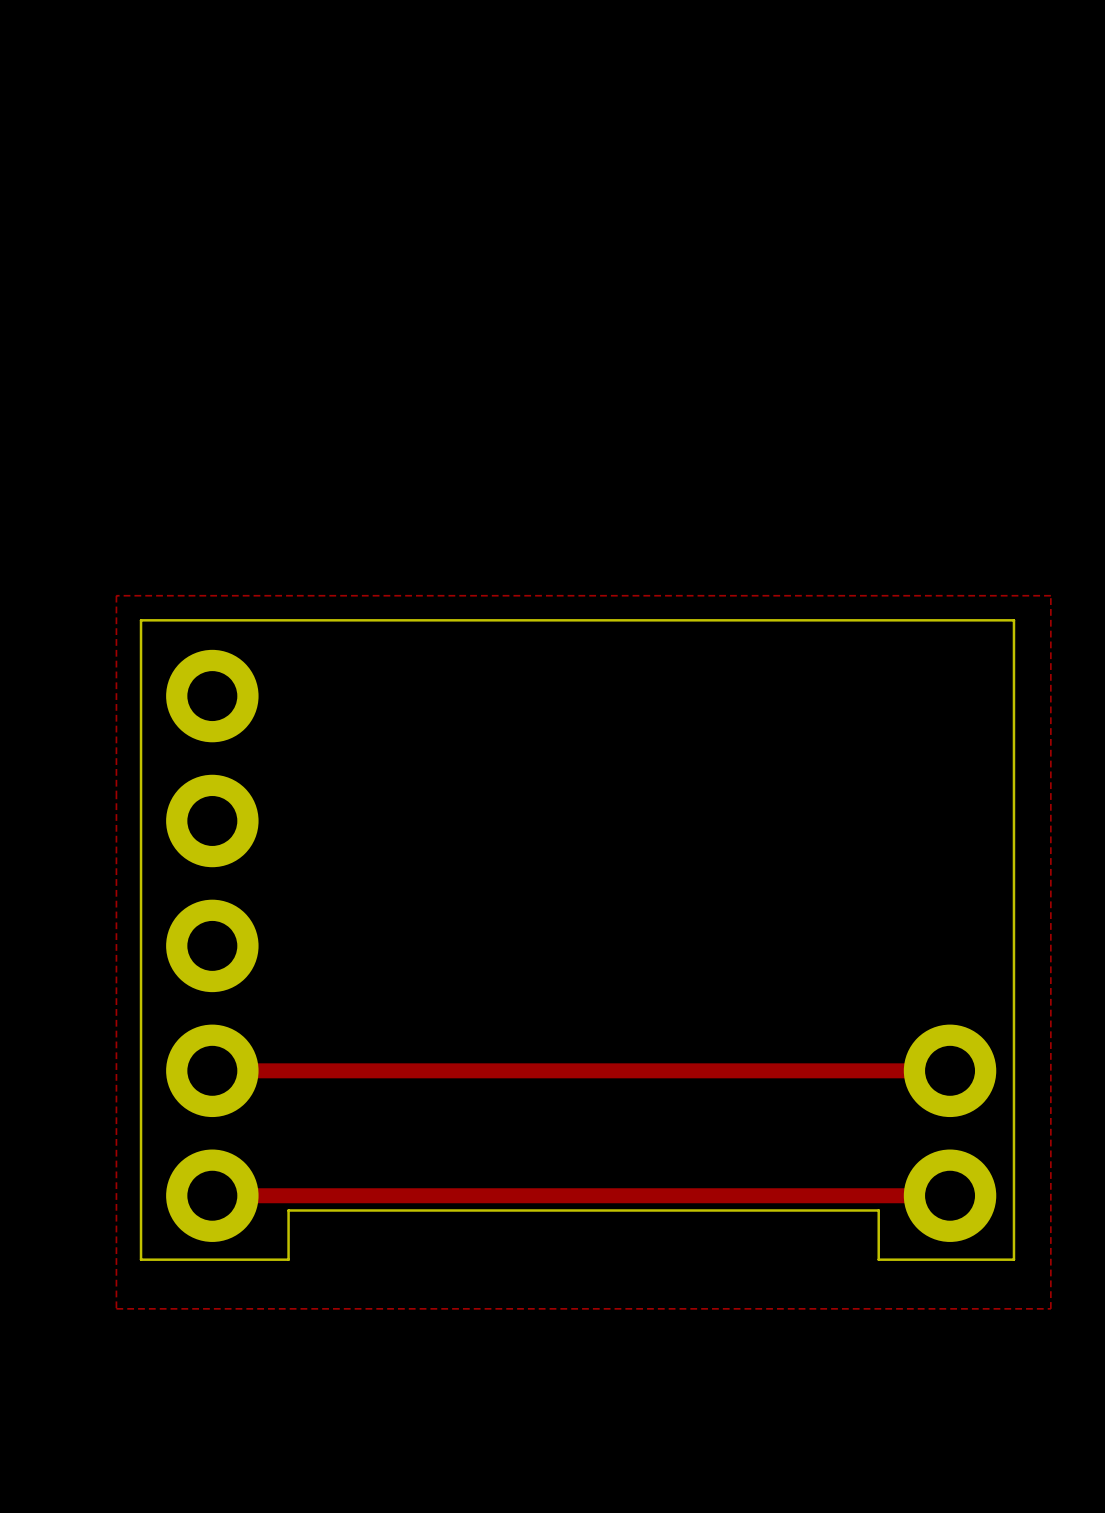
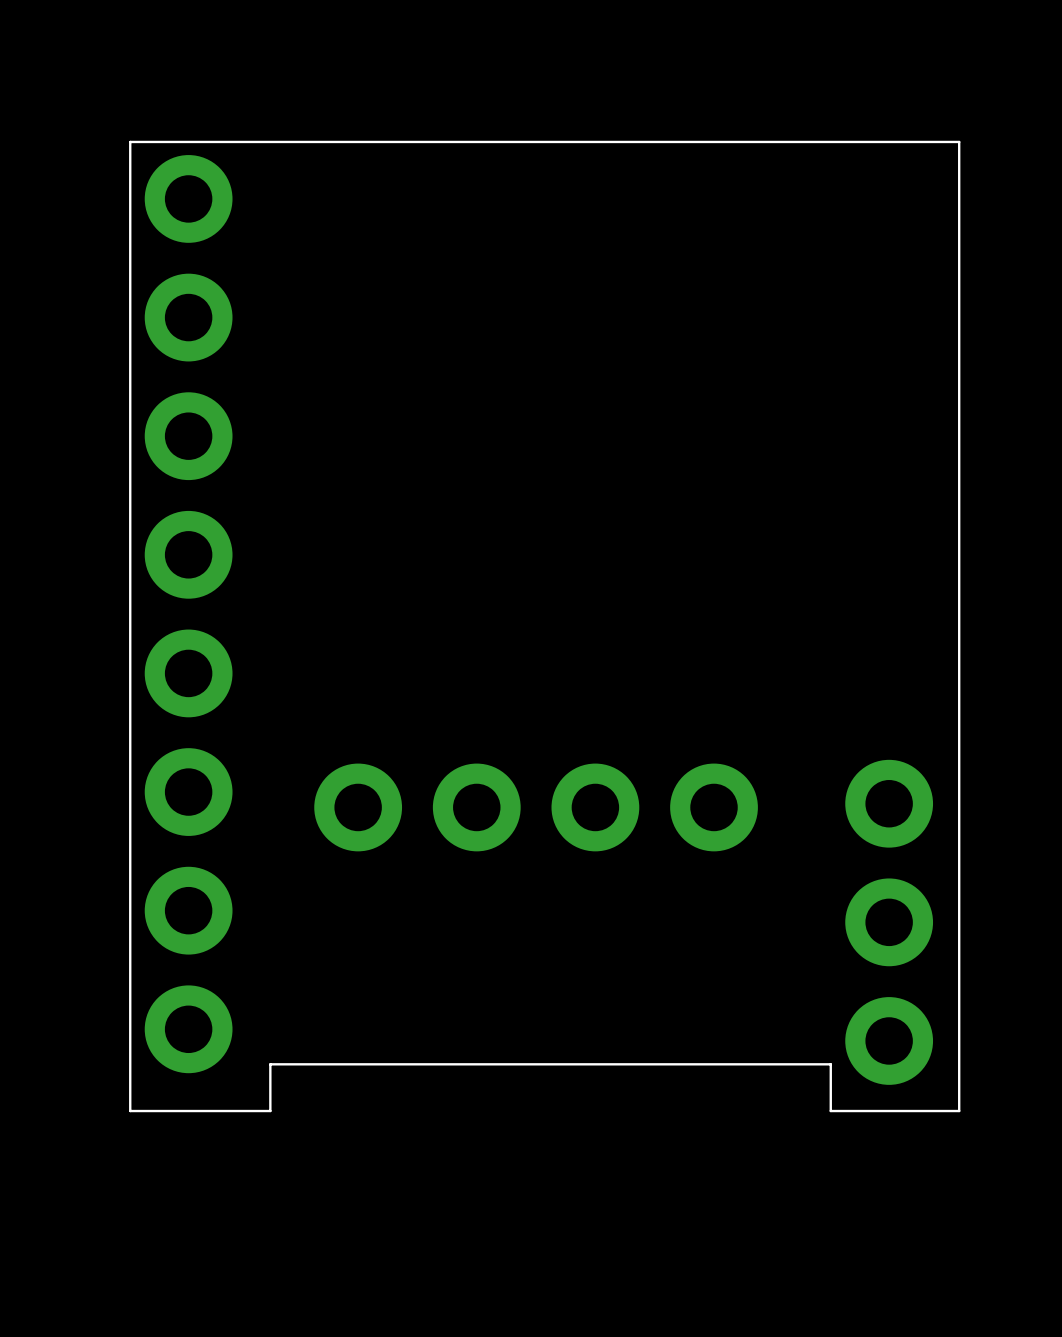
top zone outline: (1050, 595) (116, 595) (116, 1308) (1050, 1308) (1050, 595) -> none
board edge: (1013, 620) (141, 620) -> (959, 503) (959, 141) (130, 141) (130, 503)
part: none -> (188, 614)
part: none -> (536, 807)
part: (212, 945) -> none
part: none -> (889, 922)
top track: (950, 1070) (212, 1070) -> none
part: (950, 1133) -> none
top track: (950, 1195) (212, 1195) -> none

